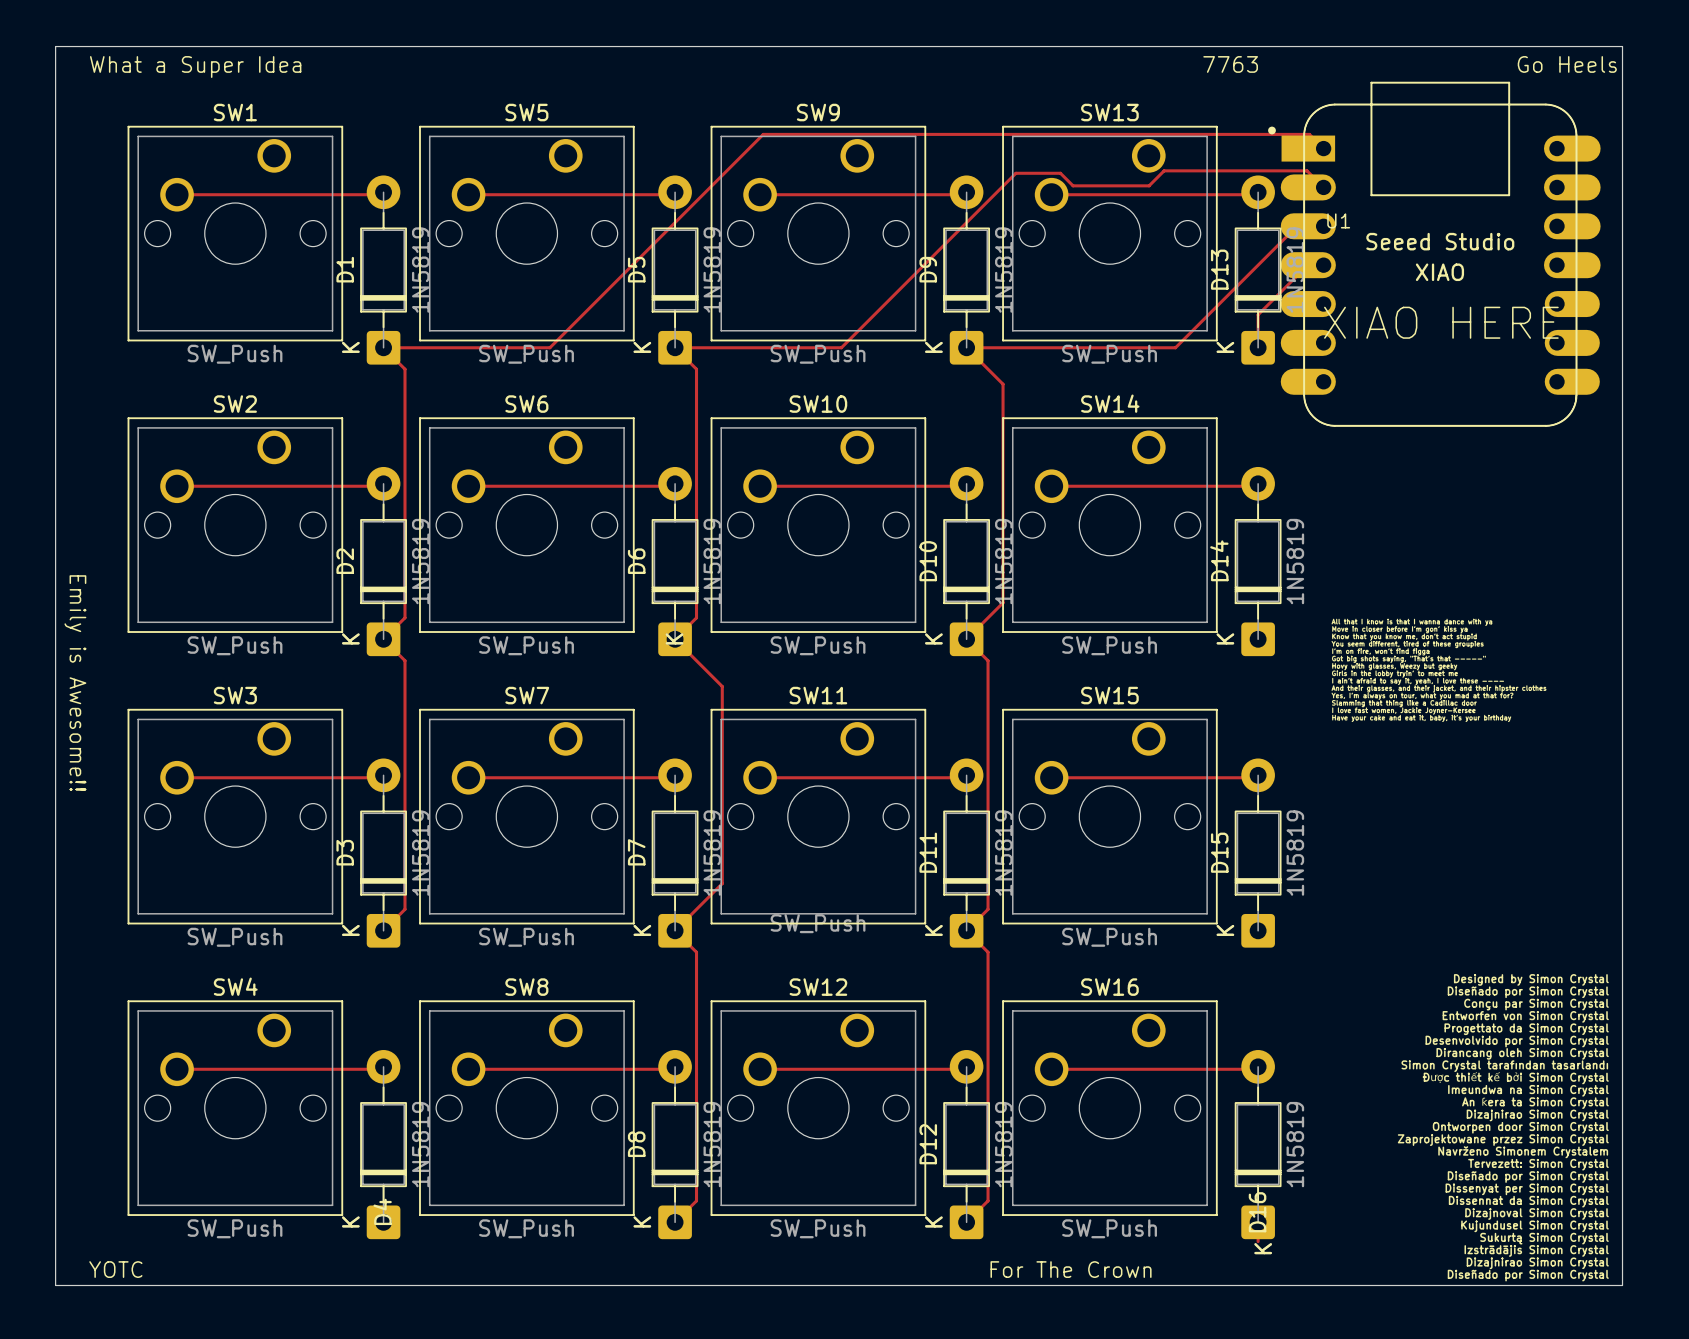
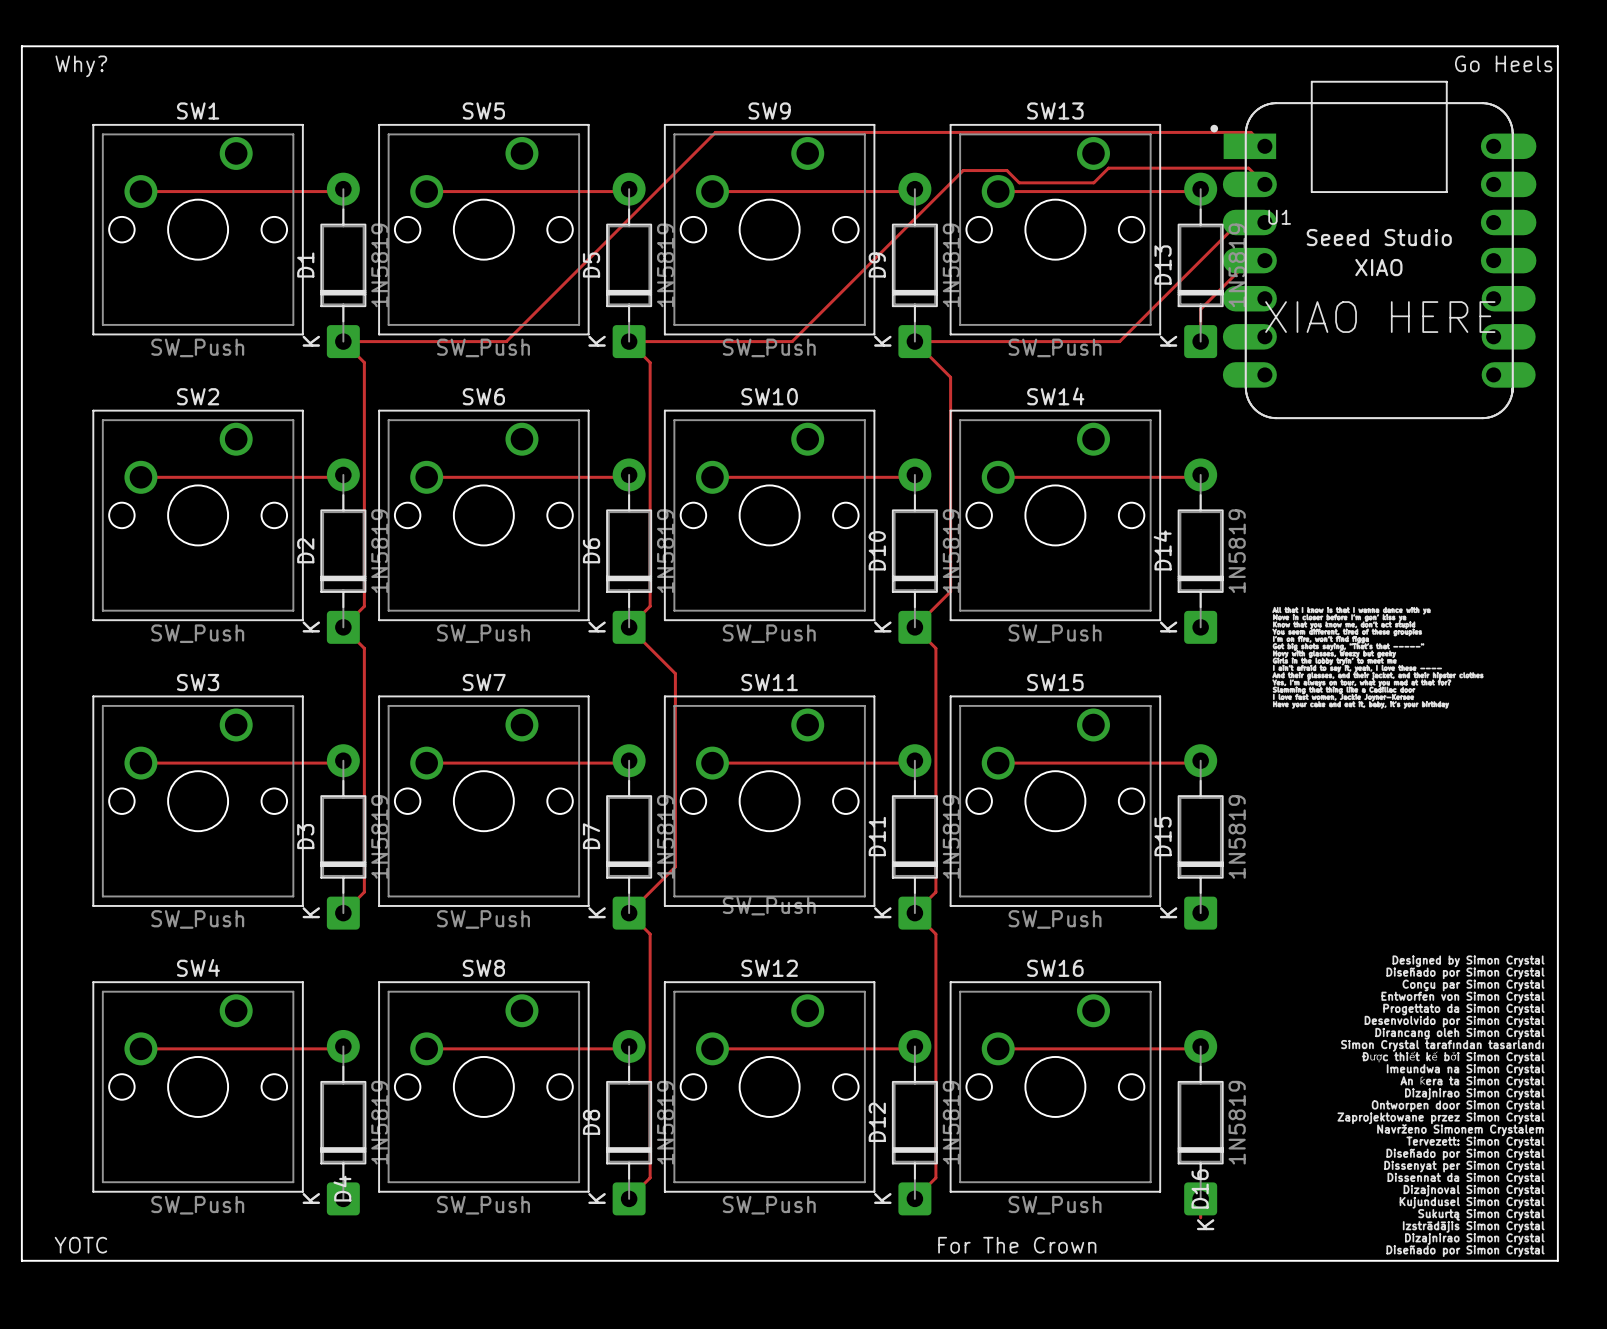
text: 7763 (1230, 64) -> none
text: What a Super Idea (195, 67) -> Why? (81, 66)
D6 footprint: [651, 466, 699, 657] -> [606, 458, 653, 644]
text: Emily is Awesome!! (75, 683) -> none

